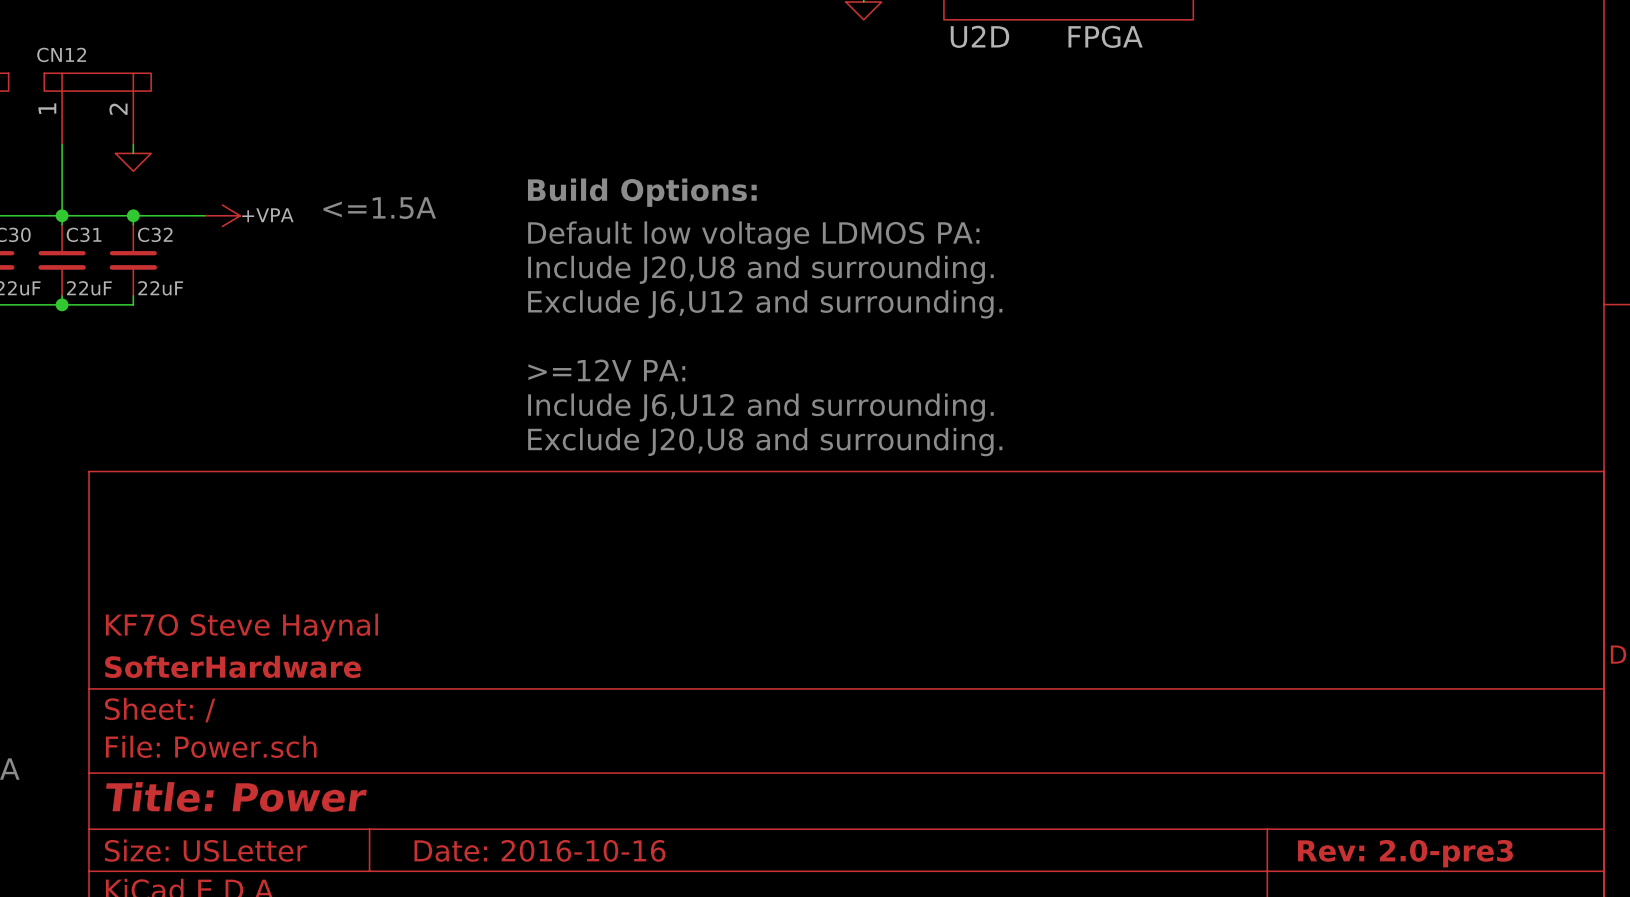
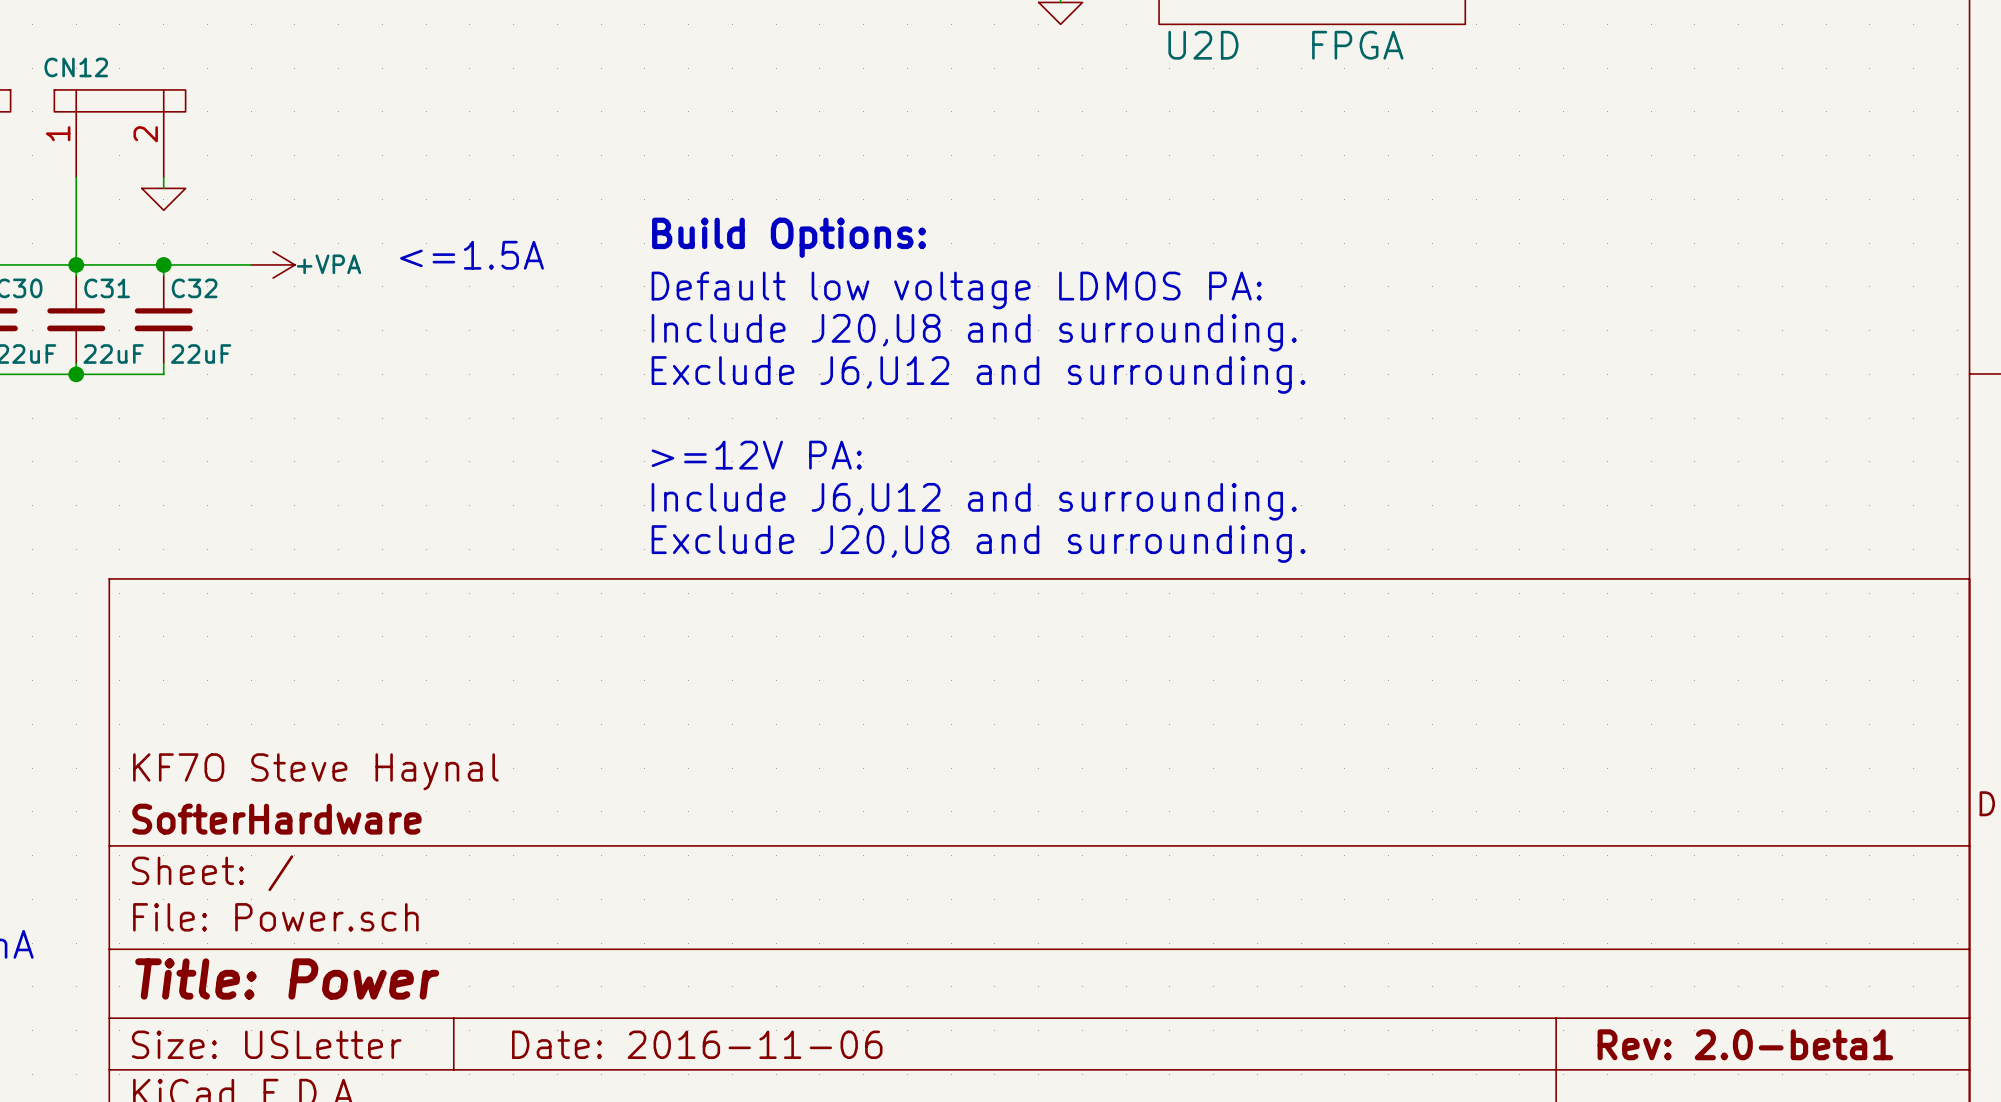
title block: Date: 2016-10-16 (539, 850) -> Date: 2016-11-06 (697, 1044)
title block: Rev: 2.0-pre3 (1405, 853) -> Rev: 2.0-beta1 (1745, 1044)

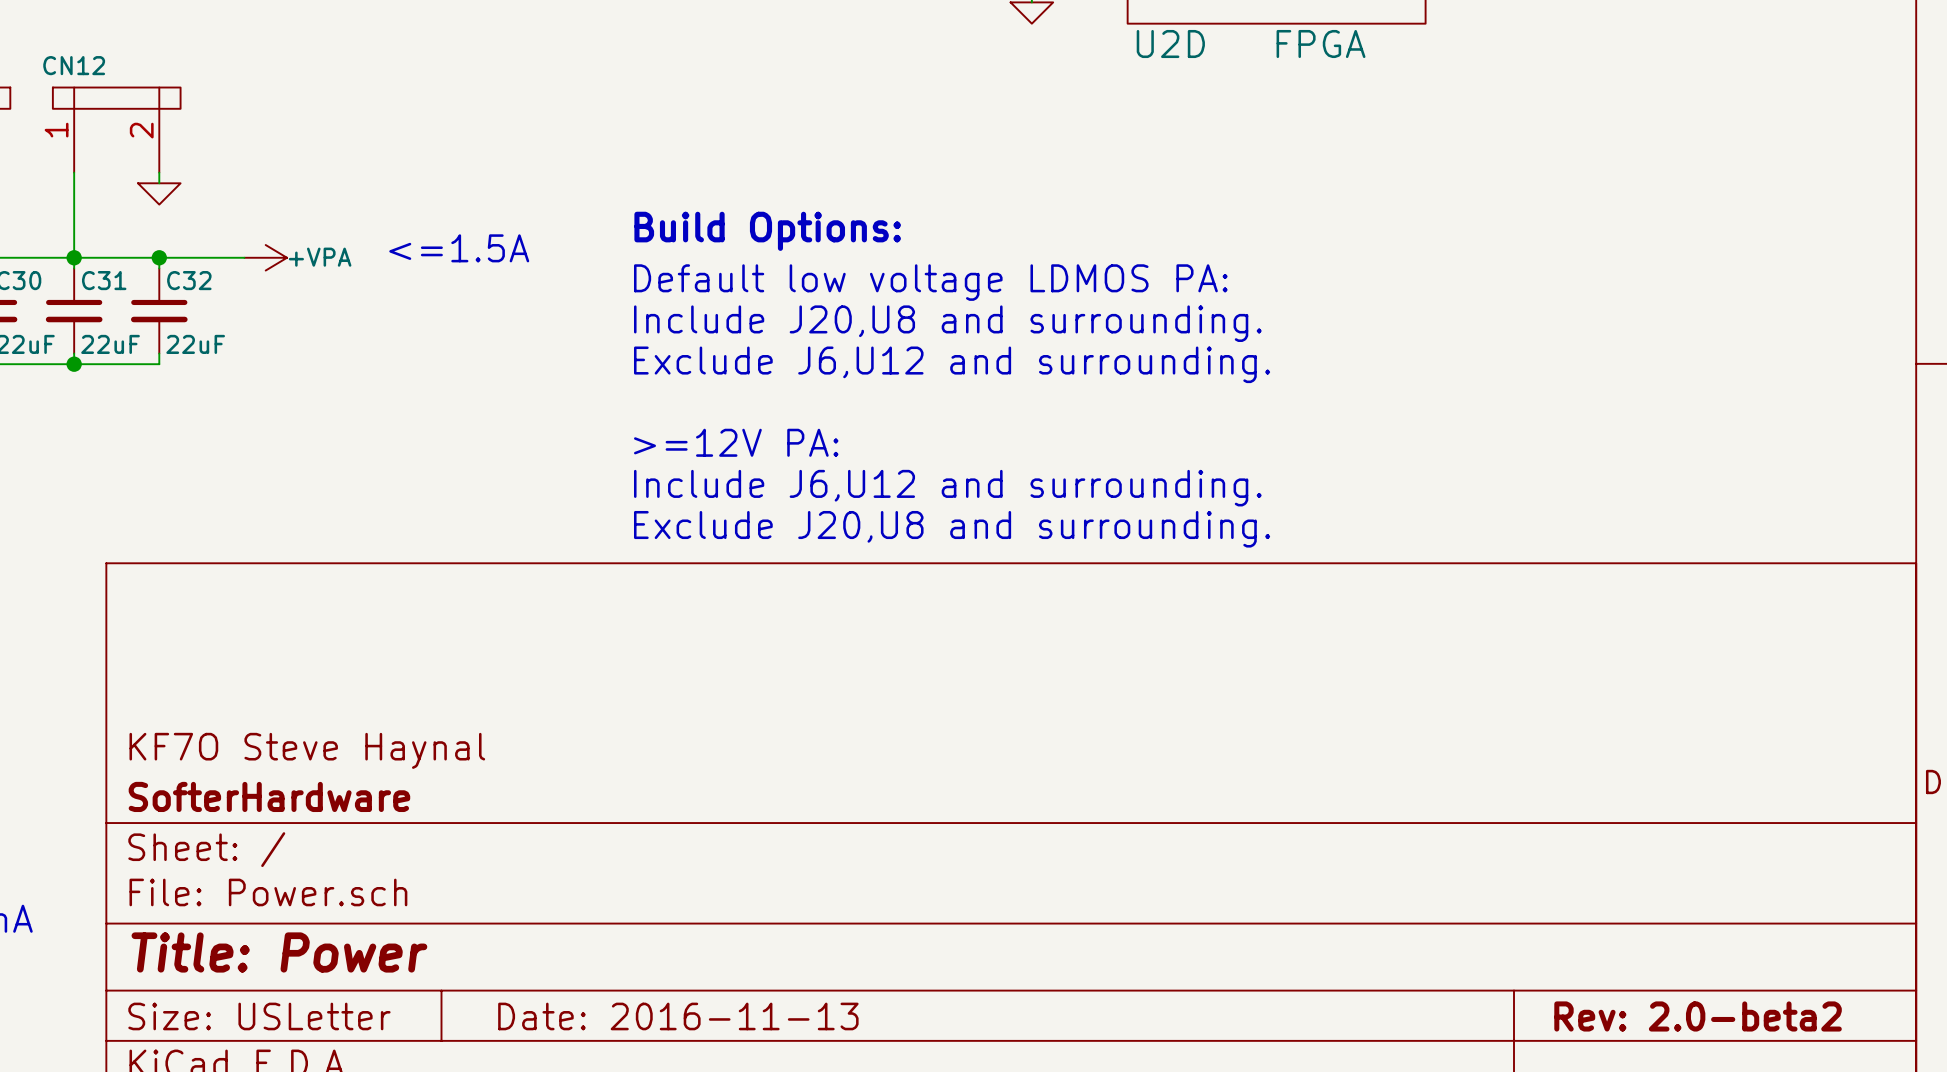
title block: Date: 2016-11-06 (697, 1044) -> Date: 2016-11-13 (678, 1016)
title block: Rev: 2.0-beta1 (1745, 1044) -> Rev: 2.0-beta2 (1698, 1016)

